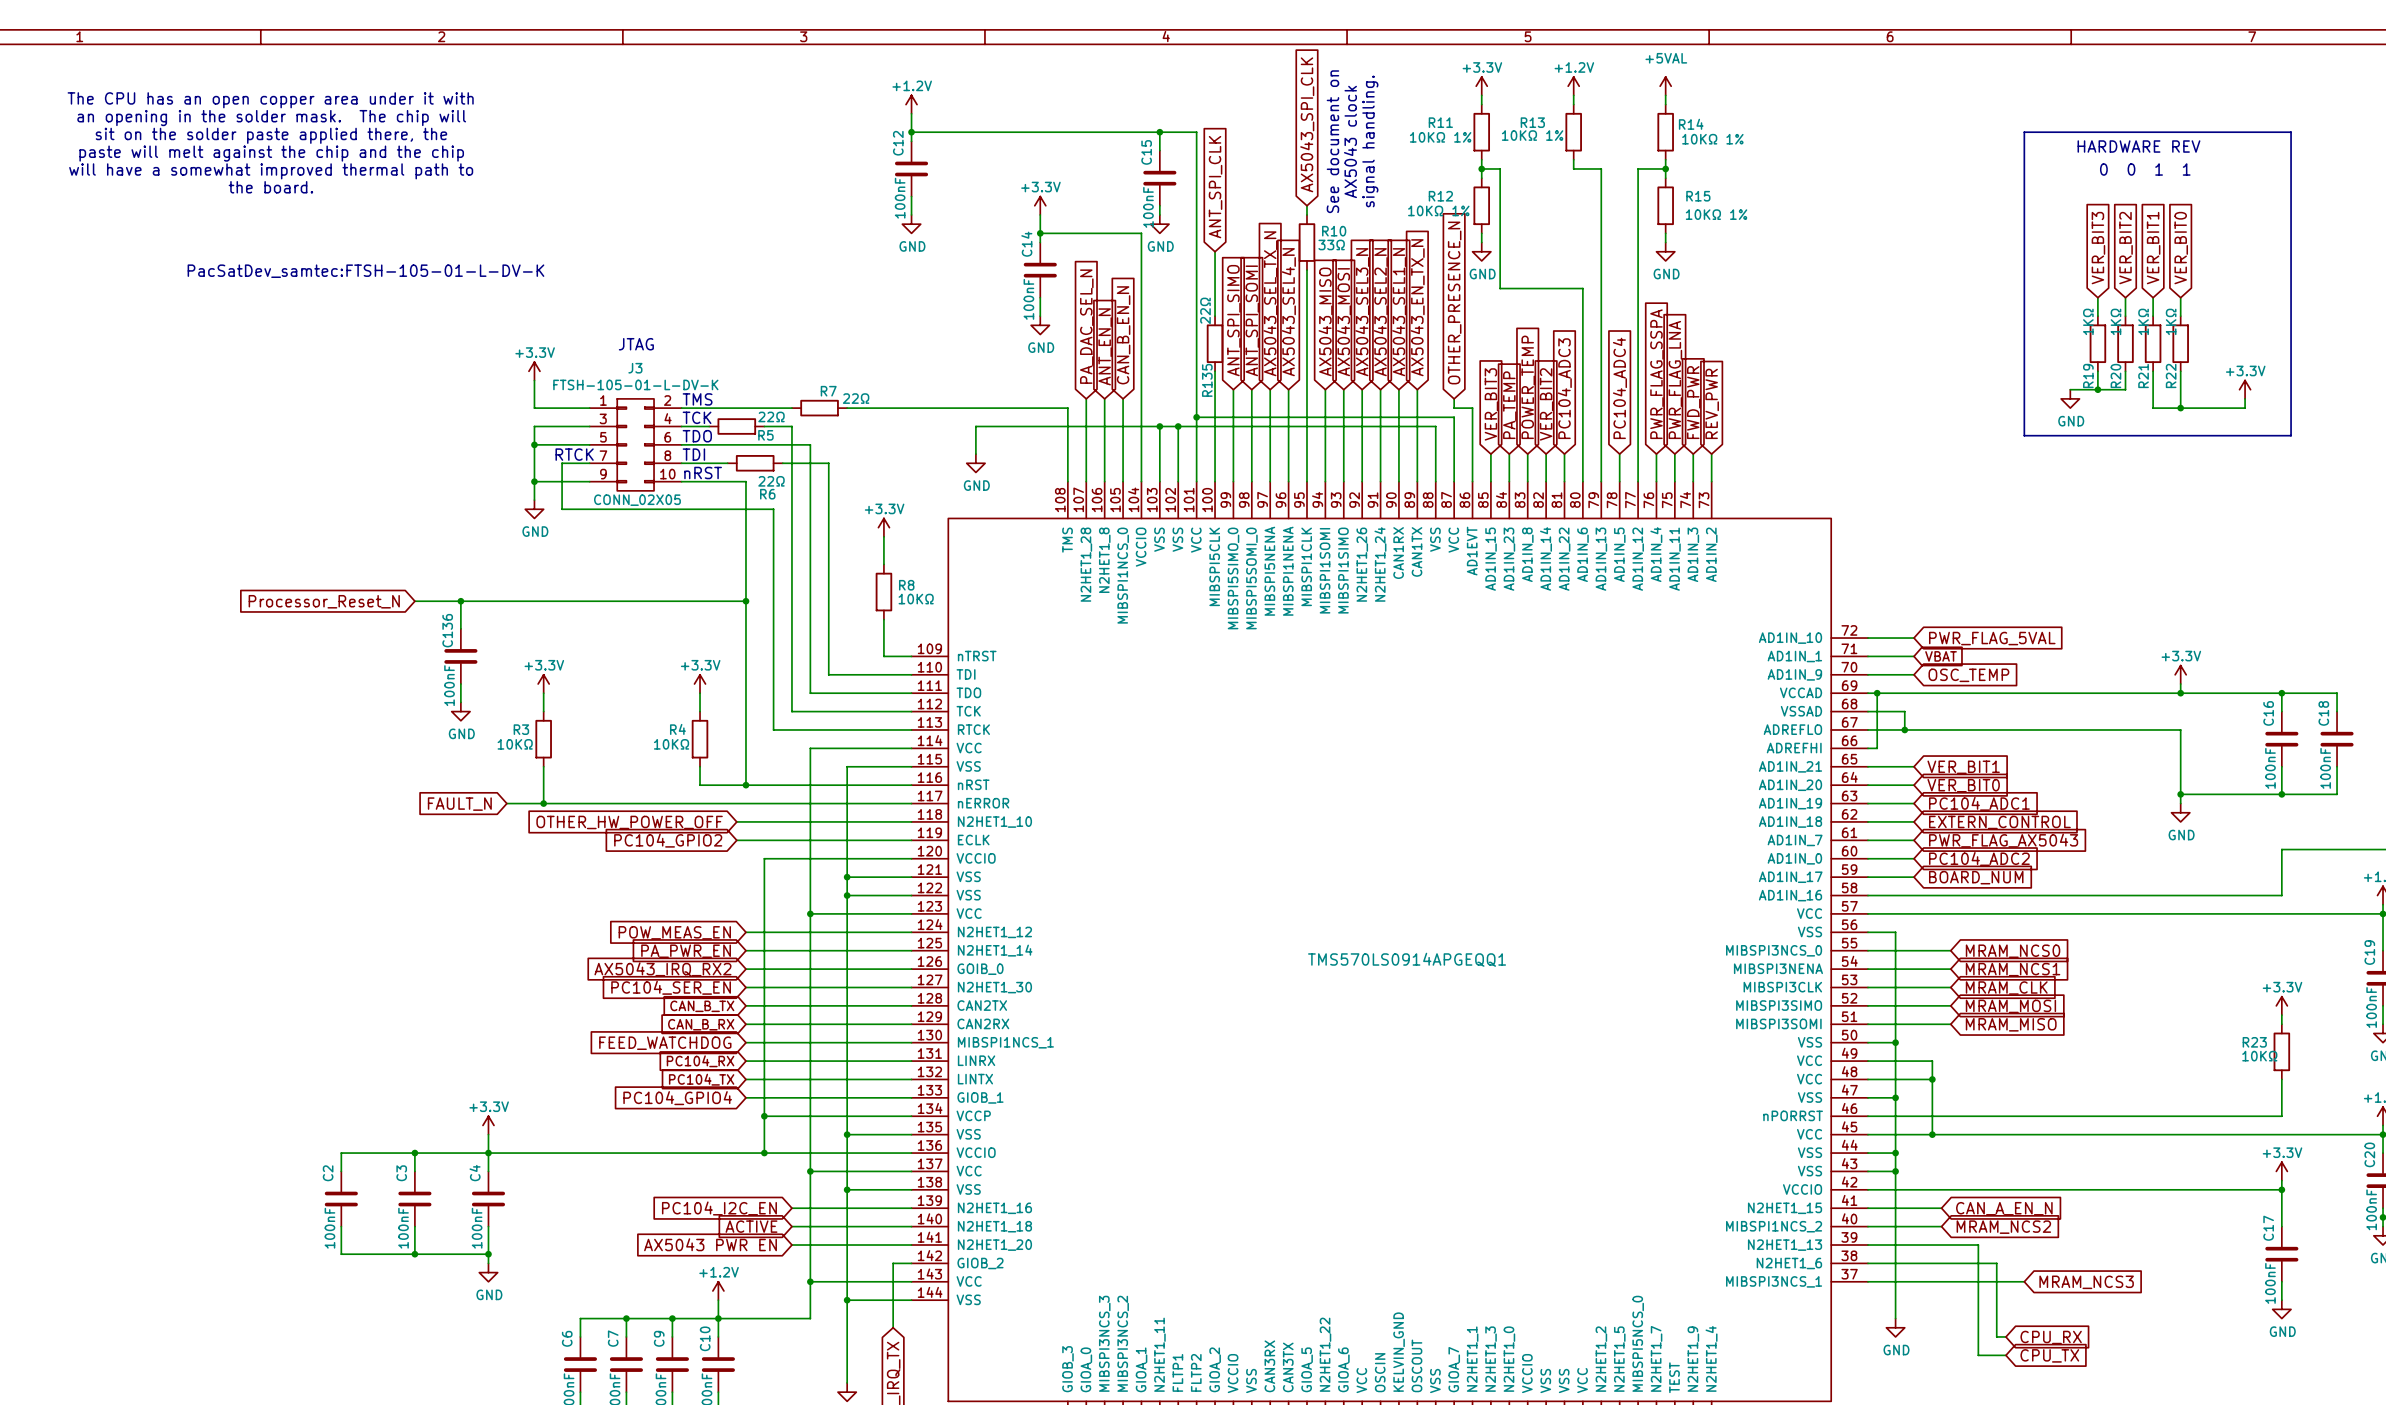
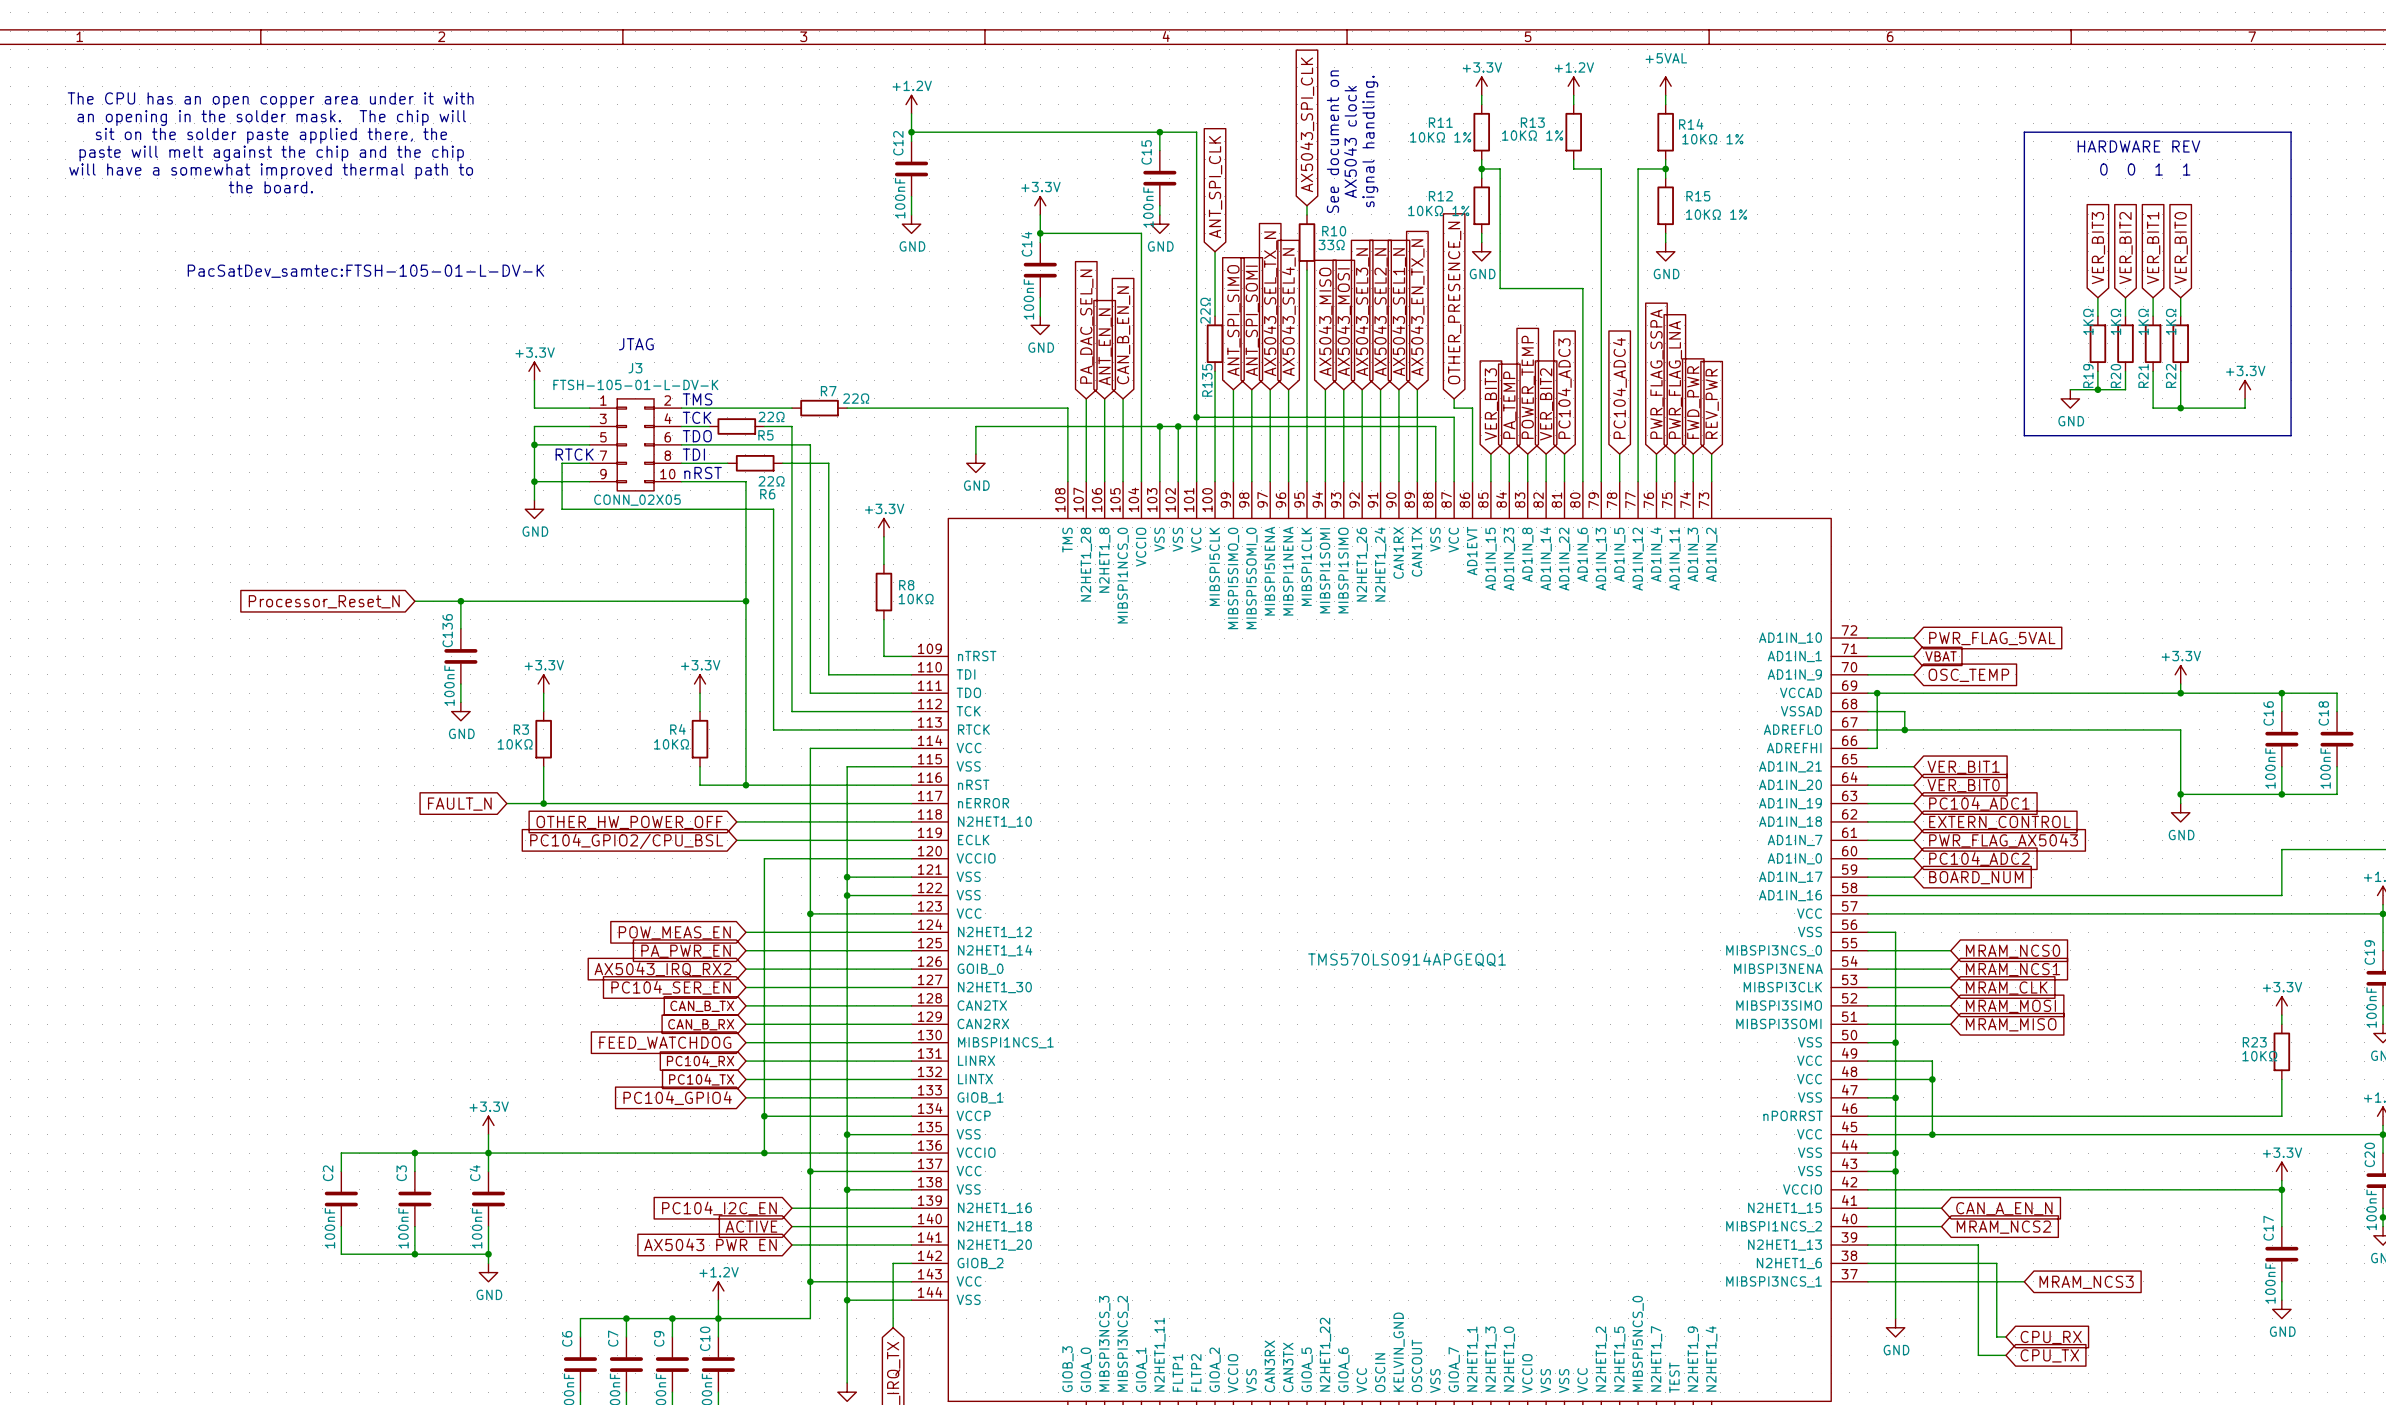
global label: PC104_GPIO2 (668, 840) -> PC104_GPIO2/CPU_BSL (626, 841)

